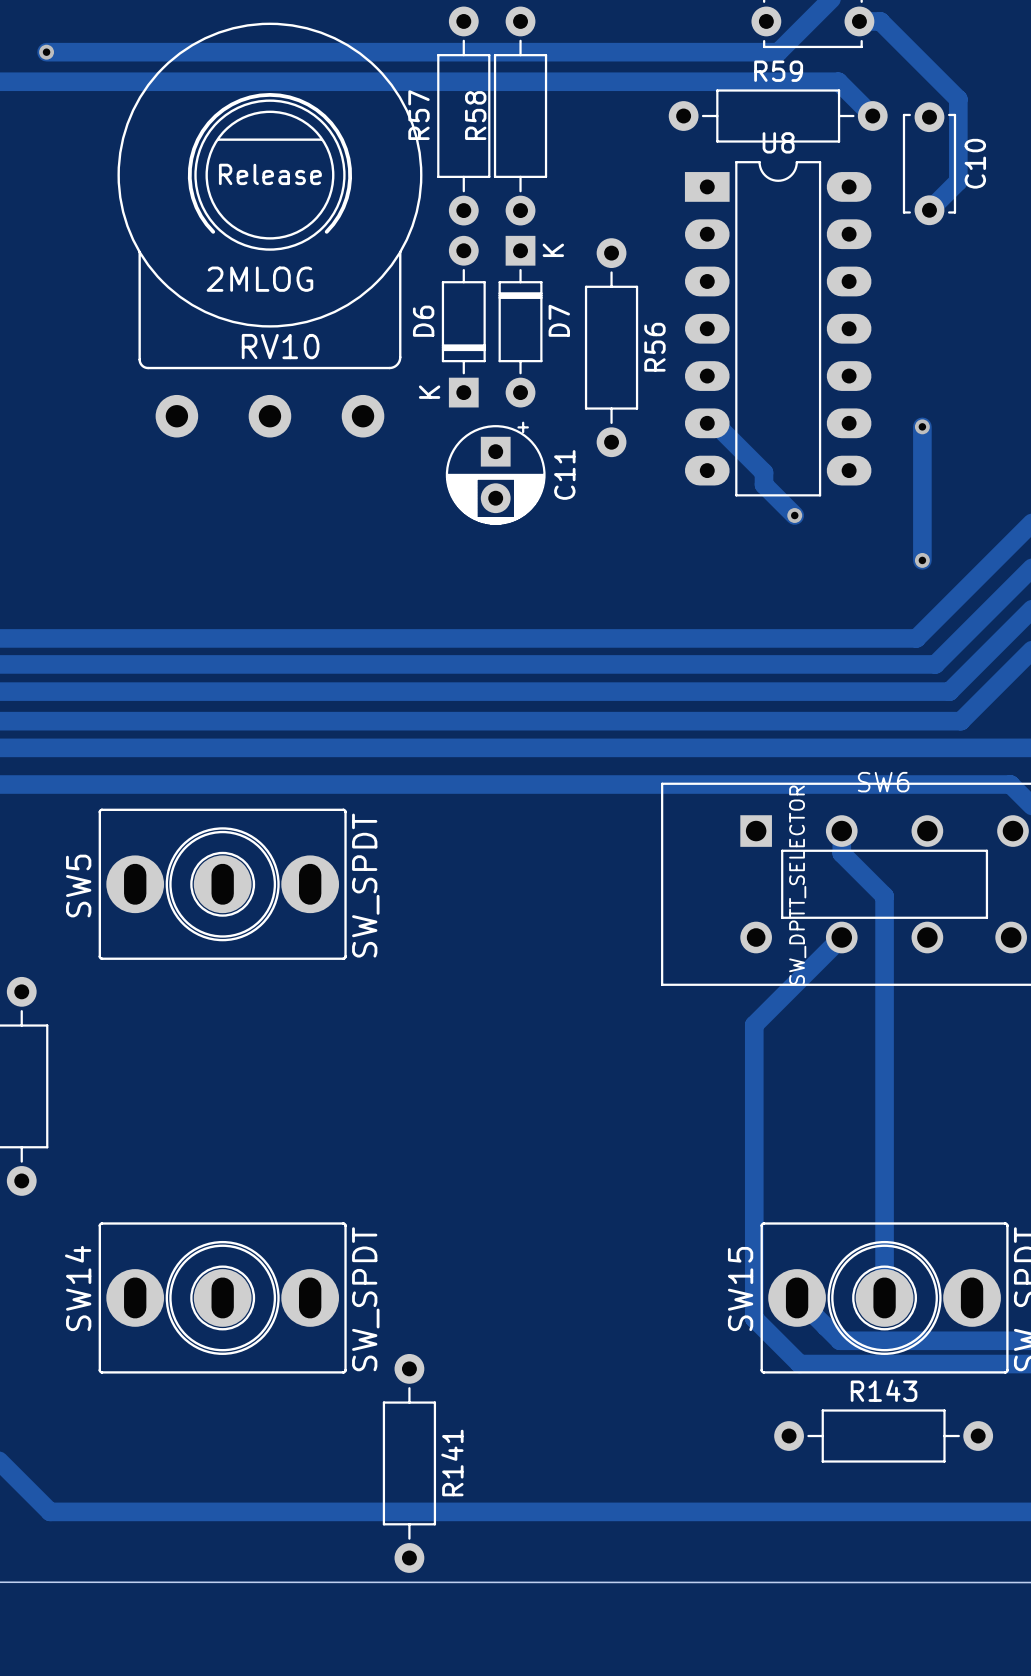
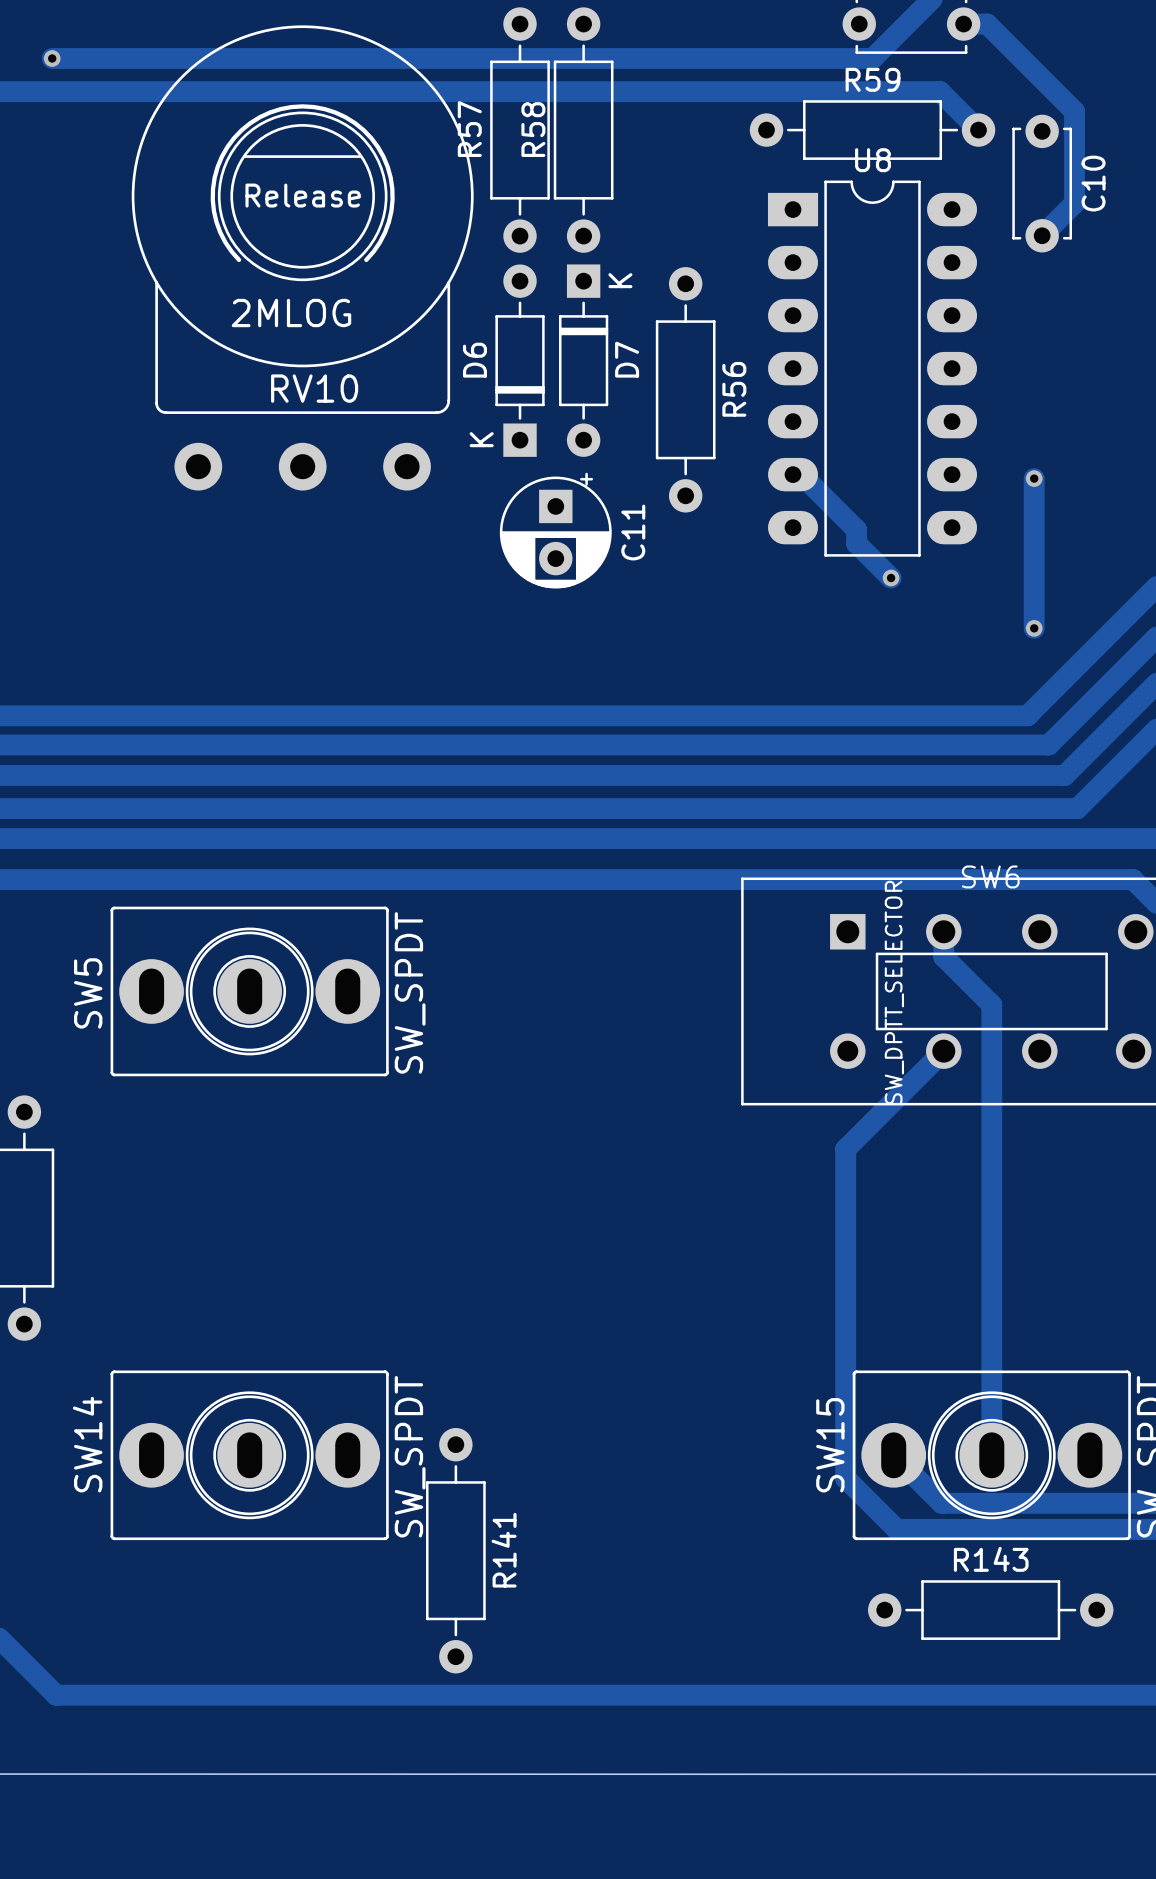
R141 position: (409, 1463) -> (455, 1550)

